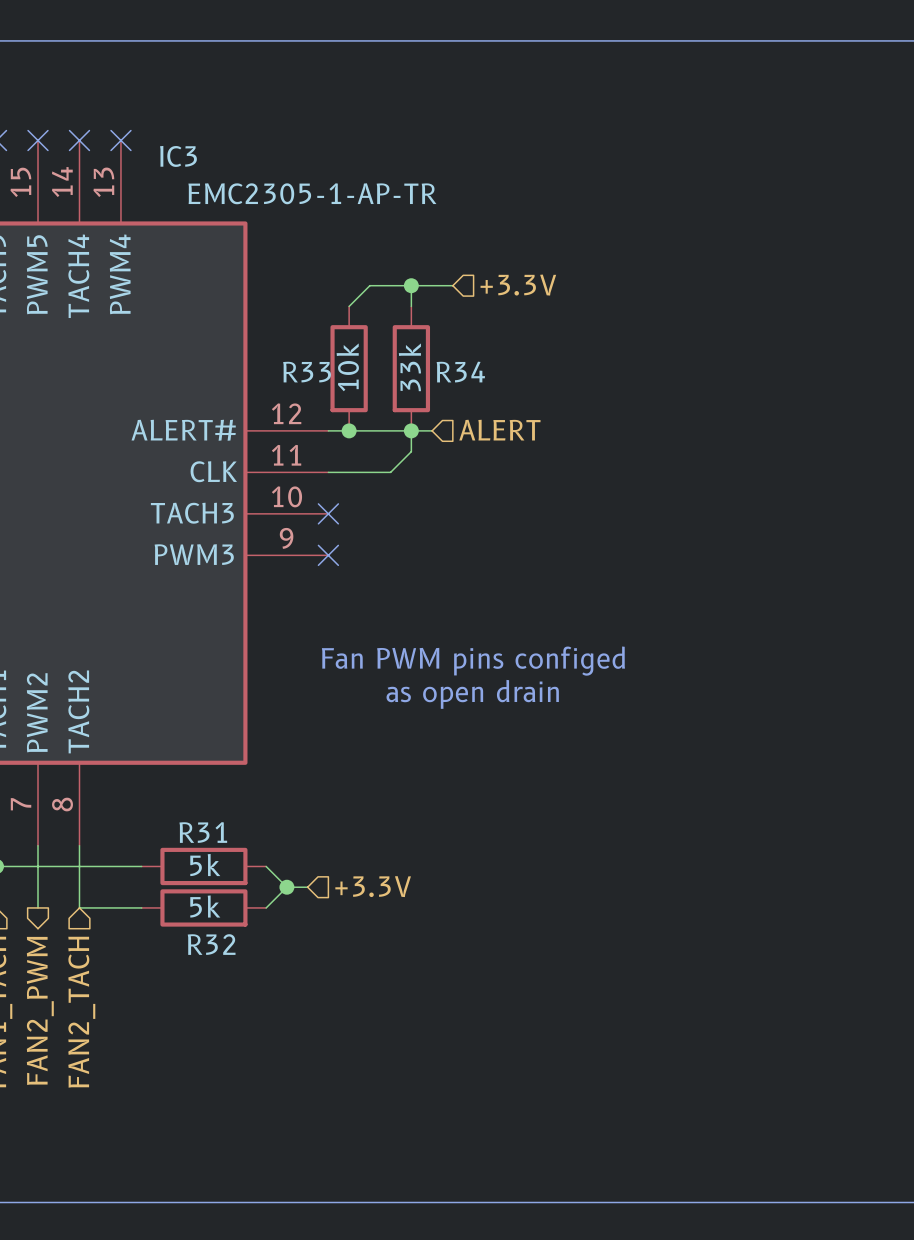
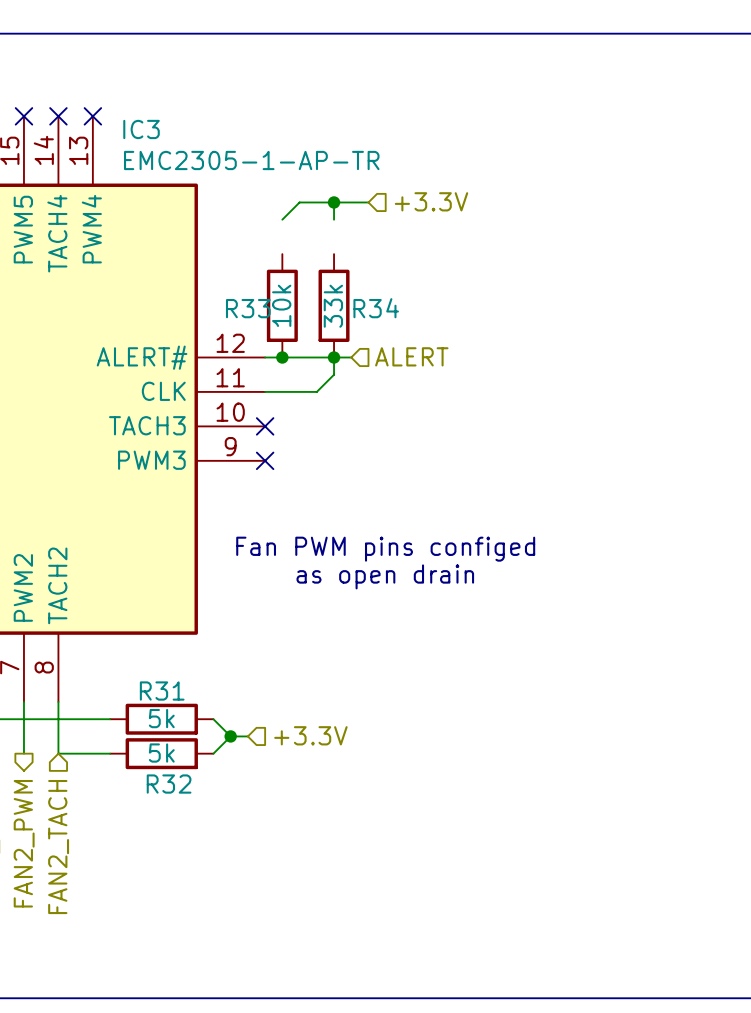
wire: (411, 285) (411, 306) -> (334, 202) (334, 219)
junction position: (411, 285) -> (334, 202)
wire: (452, 285) (369, 285) (349, 306) -> (368, 202) (299, 202) (282, 219)
hierarchical label position: +3.3V (518, 285) -> +3.3V (431, 201)

